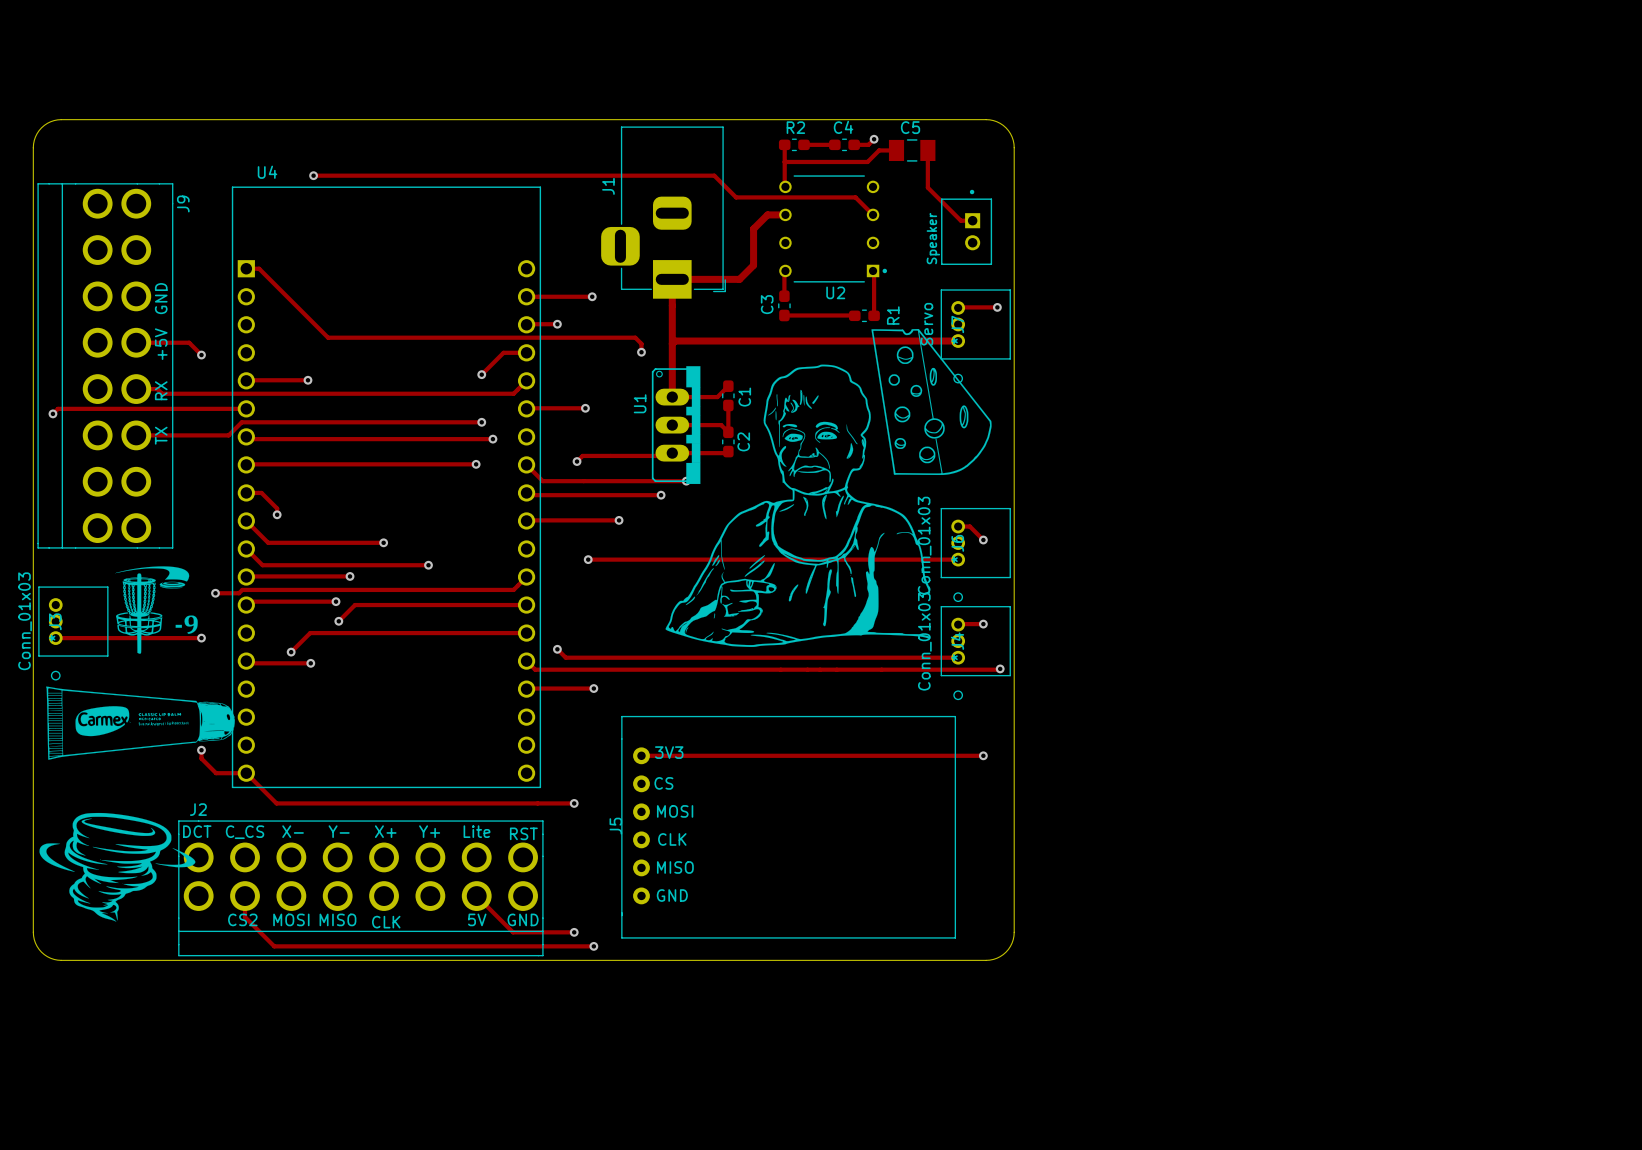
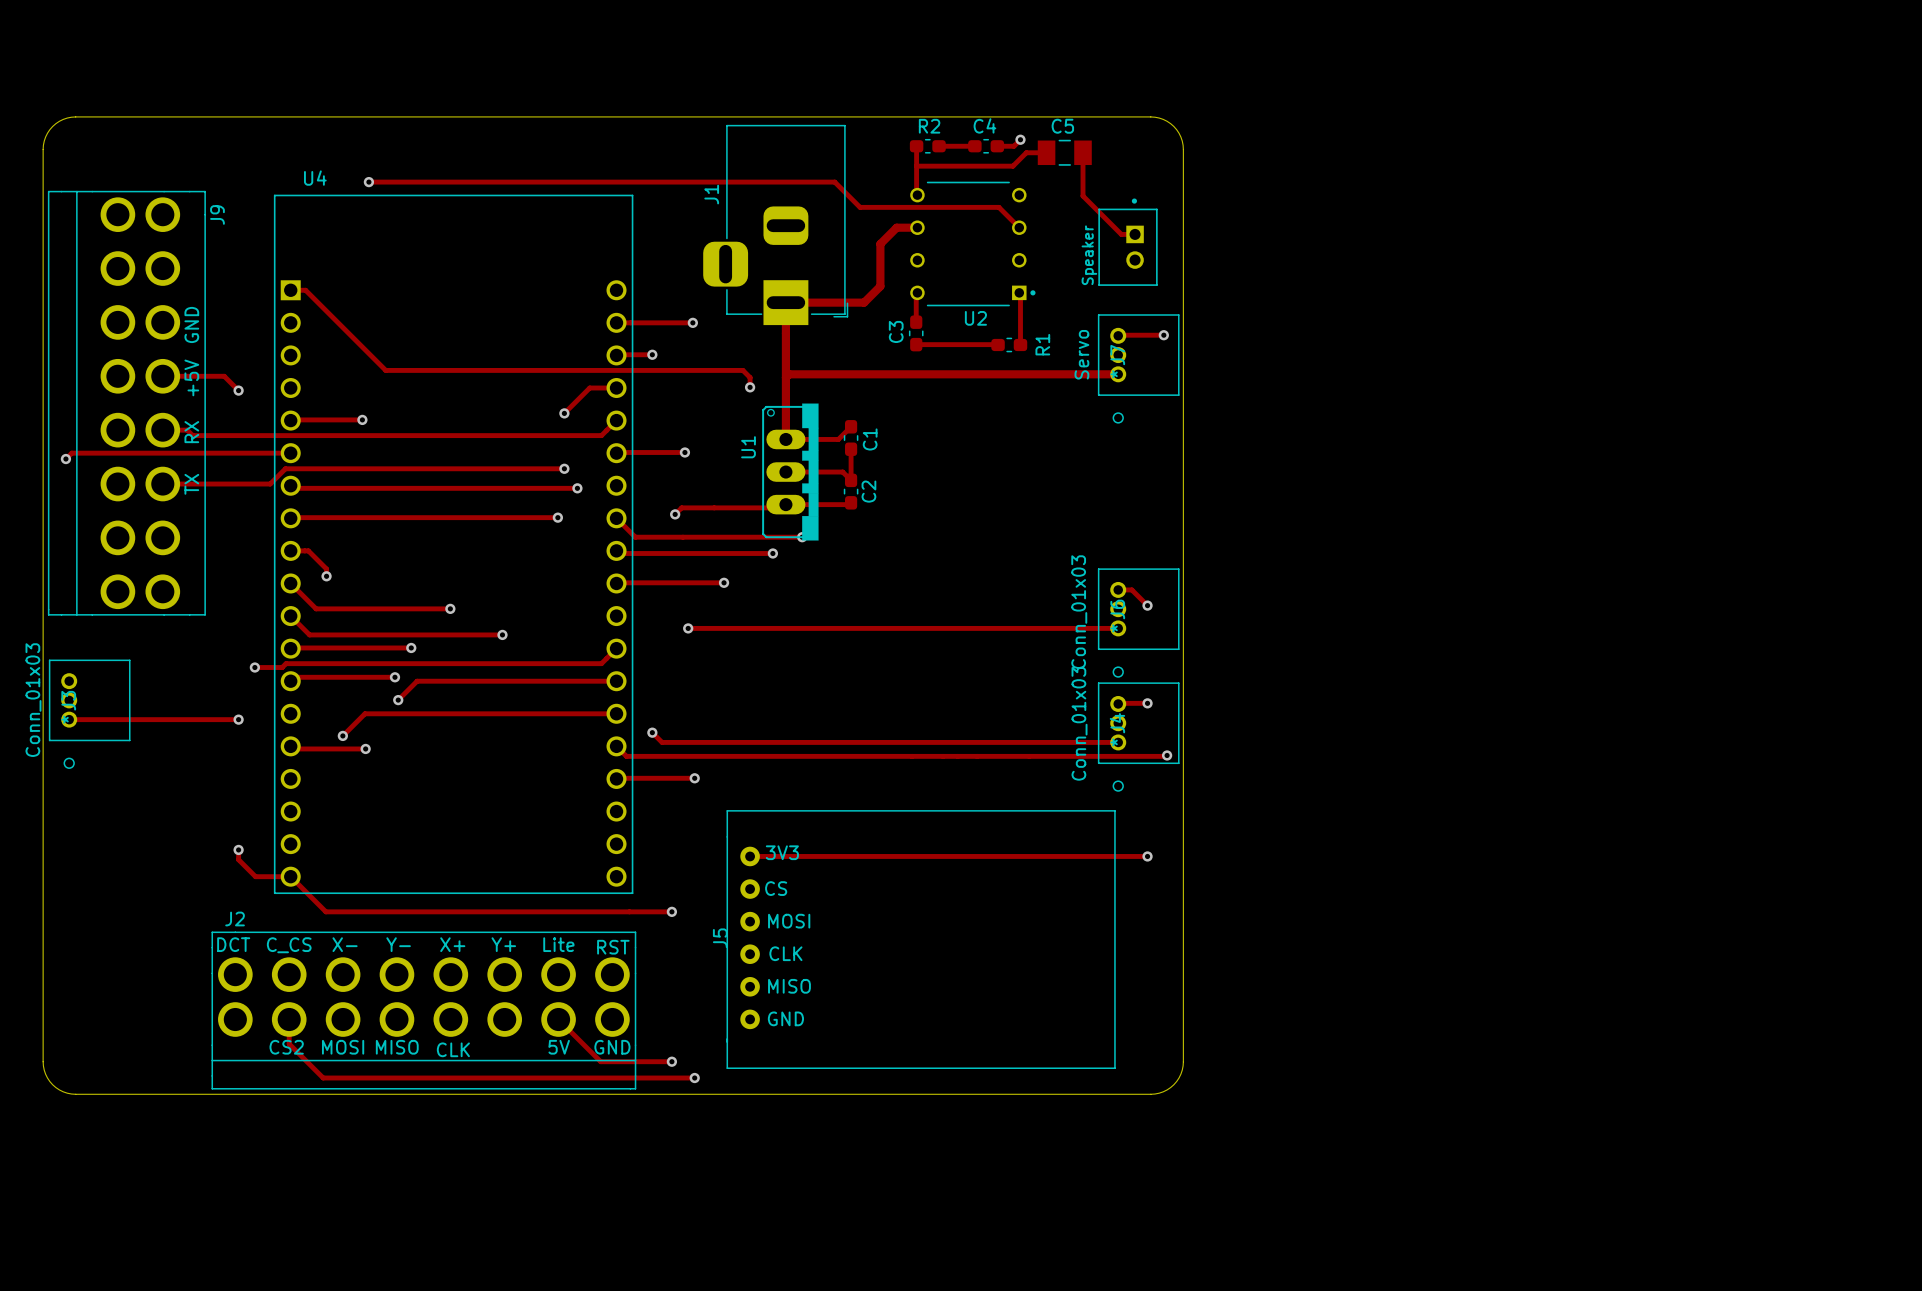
drawing: [665, 328, 992, 647] -> none
drawing: [115, 566, 198, 654] -> none
drawing: [46, 686, 235, 760] -> none
drawing: [39, 812, 196, 922] -> none

